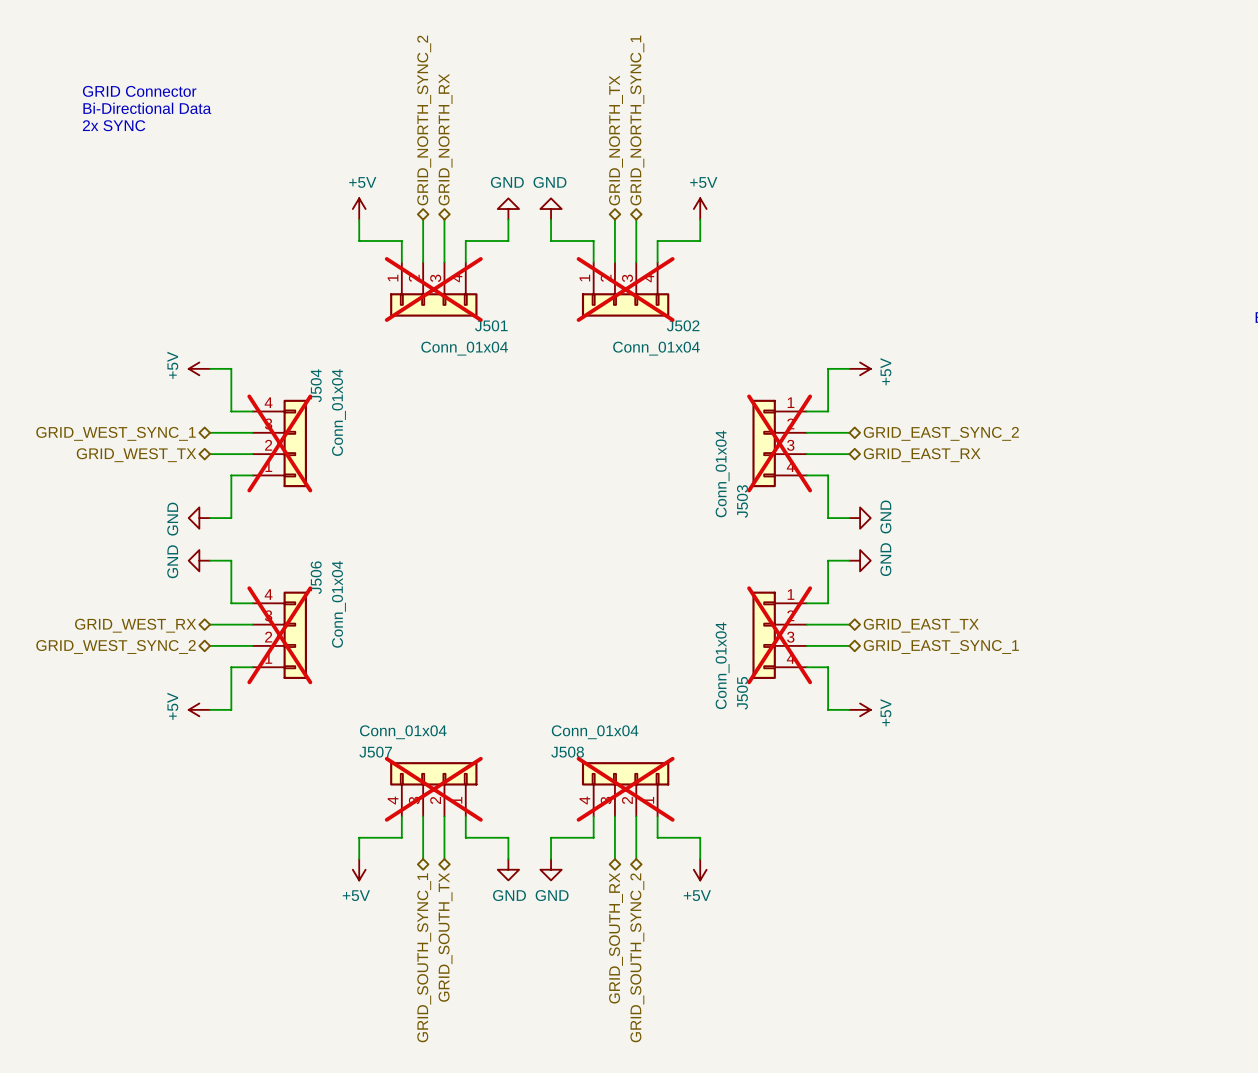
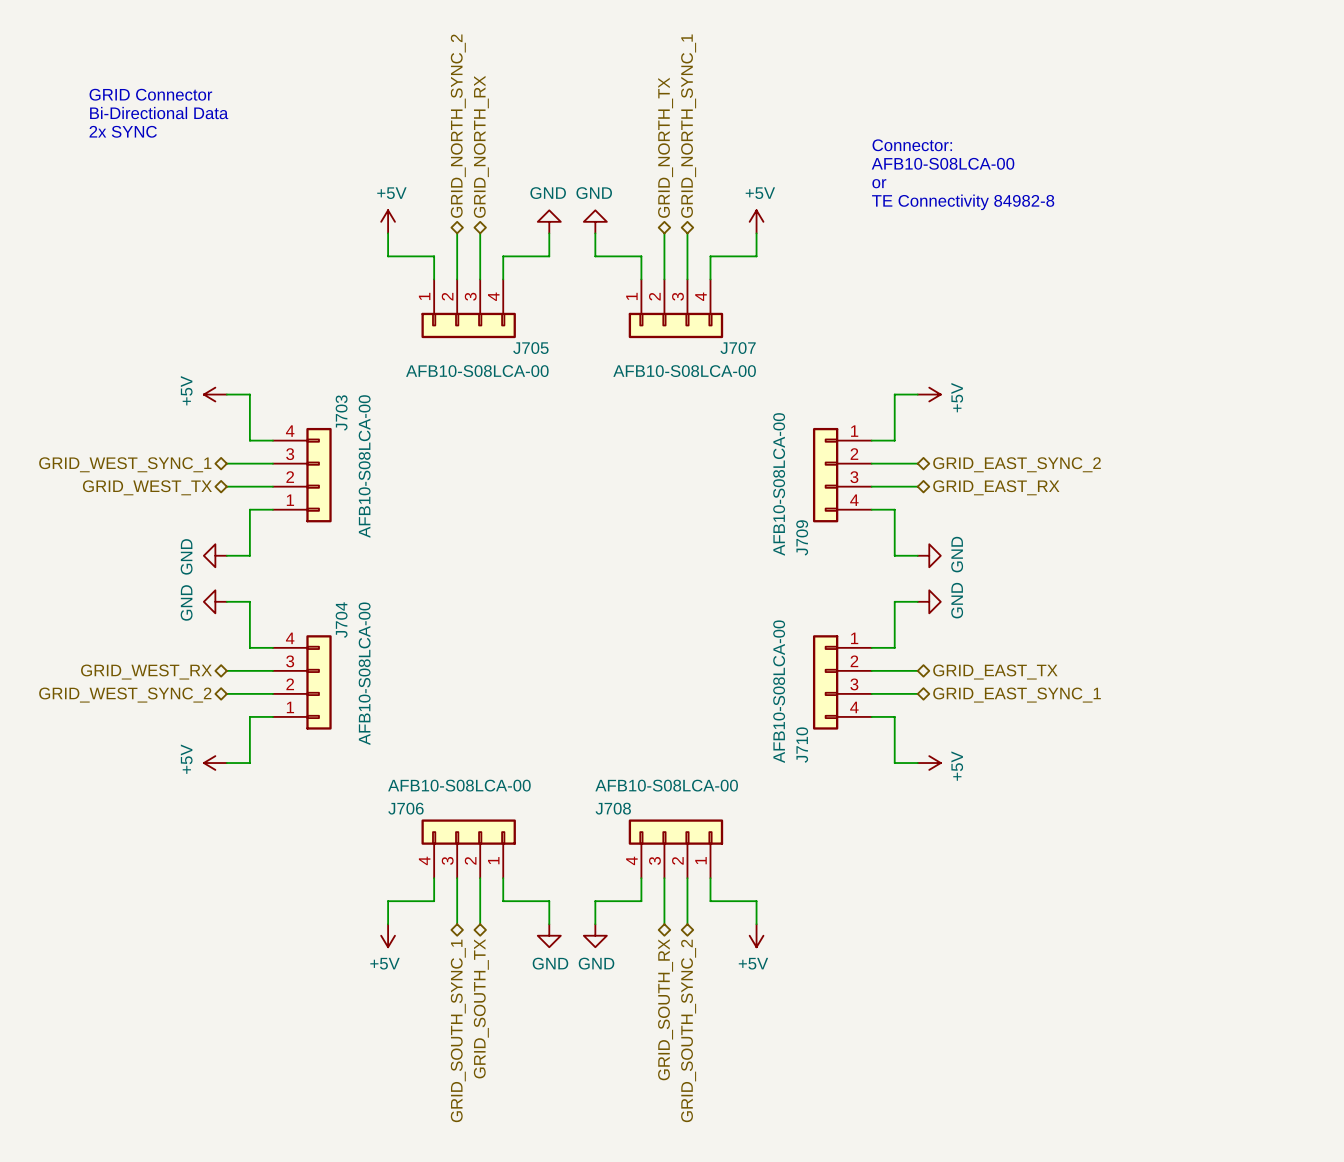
text: none -> Connector: (912, 145)
text: none -> AFB10-S08LCA-00 (943, 163)
text: none -> or (879, 183)
text: none -> TE Connectivity 84982-8 (963, 202)
J501 do-not-place cross: (433, 289) -> none
J502 do-not-place cross: (625, 289) -> none
J501 name: J501 (491, 325) -> J705 (530, 348)
J502 name: J502 (683, 325) -> J707 (738, 348)
J501 value: Conn_01x04 (464, 348) -> AFB10-S08LCA-00 (477, 371)
J502 value: Conn_01x04 (656, 348) -> AFB10-S08LCA-00 (684, 371)
J504 name: J504 (316, 385) -> J703 (341, 412)
J504 value: Conn_01x04 (338, 412) -> AFB10-S08LCA-00 (364, 466)
J504 do-not-place cross: (279, 443) -> none
J503 do-not-place cross: (779, 443) -> none
J503 value: Conn_01x04 (722, 473) -> AFB10-S08LCA-00 (779, 484)
J503 name: J503 (742, 501) -> J709 (802, 537)
J506 name: J506 (316, 577) -> J704 (341, 620)
J506 value: Conn_01x04 (338, 604) -> AFB10-S08LCA-00 (364, 673)
J506 do-not-place cross: (279, 635) -> none
J505 do-not-place cross: (779, 635) -> none
J505 value: Conn_01x04 (722, 665) -> AFB10-S08LCA-00 (779, 691)
J505 name: J505 (742, 693) -> J710 (802, 745)
J507 value: Conn_01x04 (403, 732) -> AFB10-S08LCA-00 (459, 785)
J508 value: Conn_01x04 (595, 732) -> AFB10-S08LCA-00 (666, 785)
J507 name: J507 (375, 752) -> J706 (406, 808)
J508 name: J508 (567, 752) -> J708 (613, 808)
J507 do-not-place cross: (433, 789) -> none
J508 do-not-place cross: (625, 789) -> none

